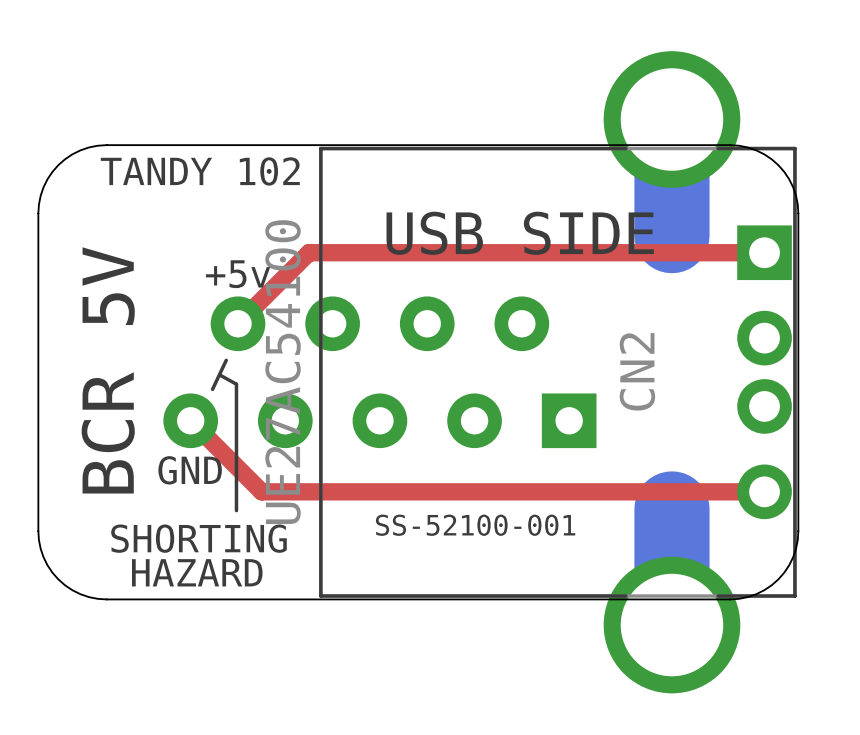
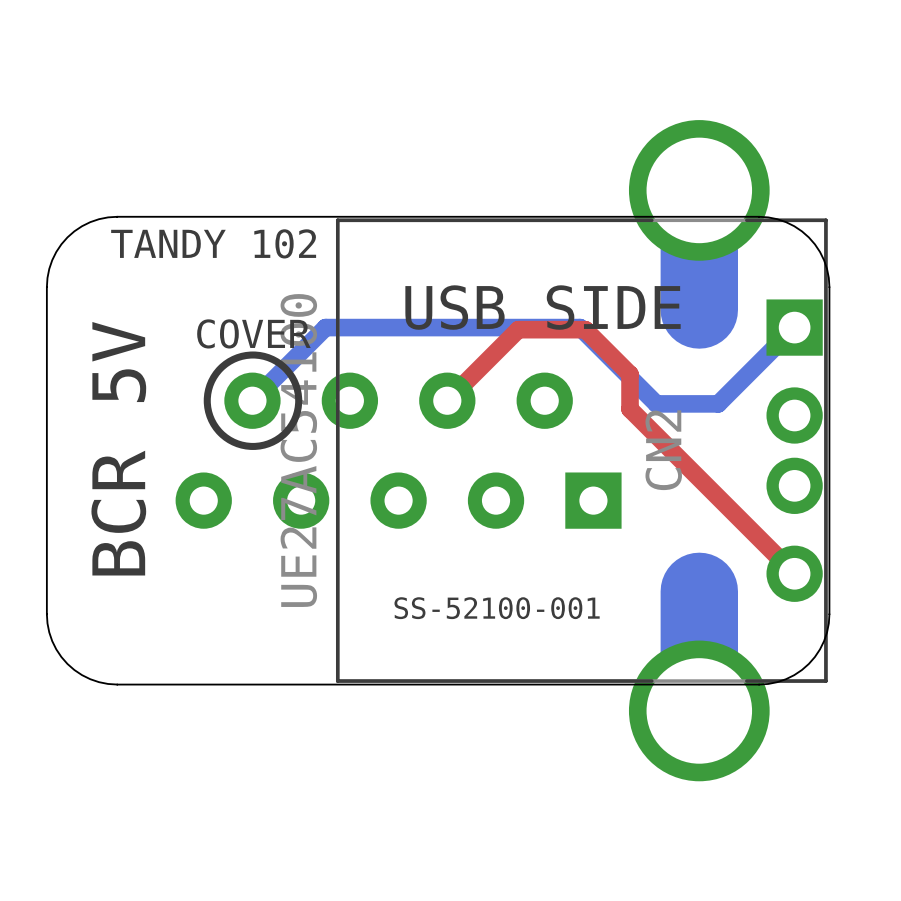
top track: (764, 252) (309, 252) (238, 323) -> none
bottom track: none -> (794, 327) (718, 403) (656, 403) (580, 327) (325, 327) (252, 400)
text: +5v (238, 274) -> COVER (253, 333)
drawing: none -> [203, 351, 303, 450]
line: (226, 360) (212, 389) -> none
line: (221, 375) (236, 384) (236, 510) -> none
top track: (190, 420) (261, 491) (764, 491) -> (447, 400) (518, 329) (585, 329) (630, 374) (630, 409) (794, 573)
text: GND (190, 470) -> none
text: SHORTING (198, 538) -> none
text: HAZARD (197, 572) -> none

